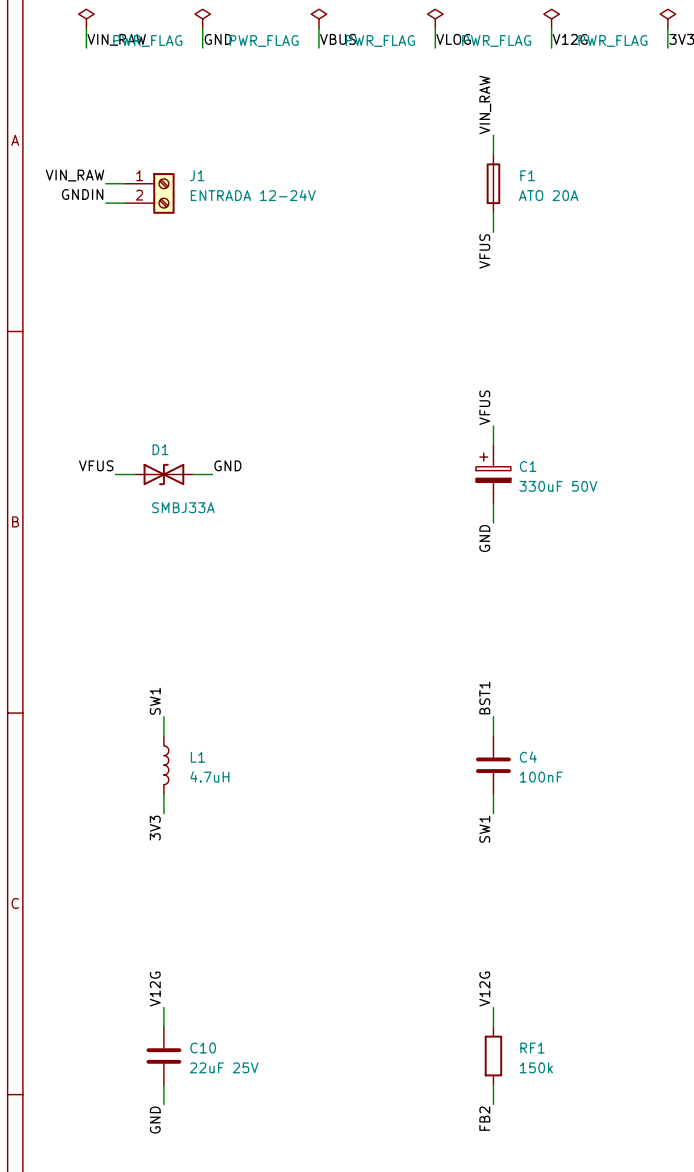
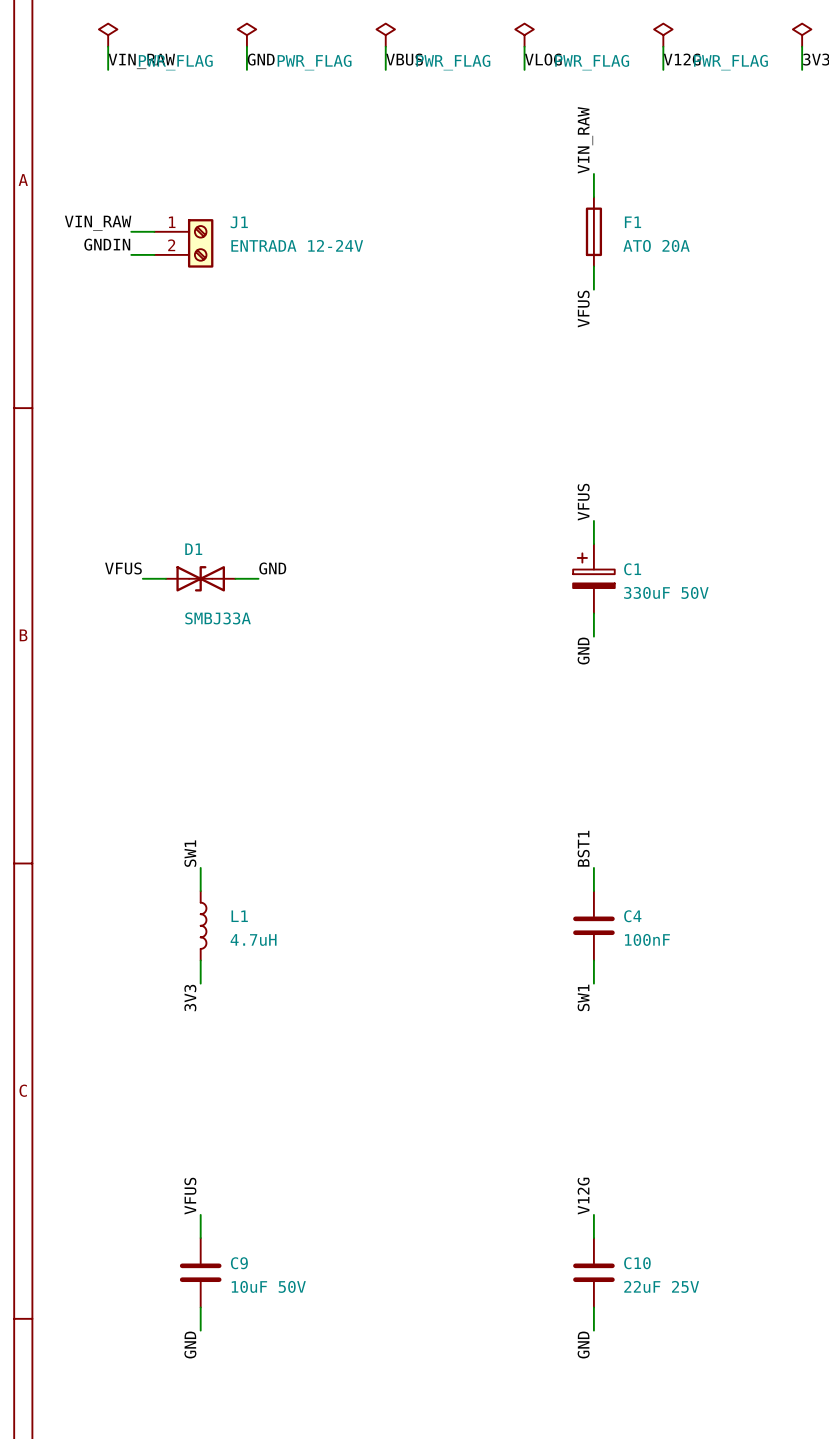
label: V12G (155, 989) -> VFUS (190, 1196)
C10 name: C10 (203, 1048) -> C9 (239, 1263)
RF1: 150k (493, 1056) -> none
C10: none -> 22uF 25V (593, 1272)
C10 value: 22uF 25V (224, 1067) -> 10uF 50V (268, 1286)
label: FB2 (484, 1118) -> GND (583, 1345)

